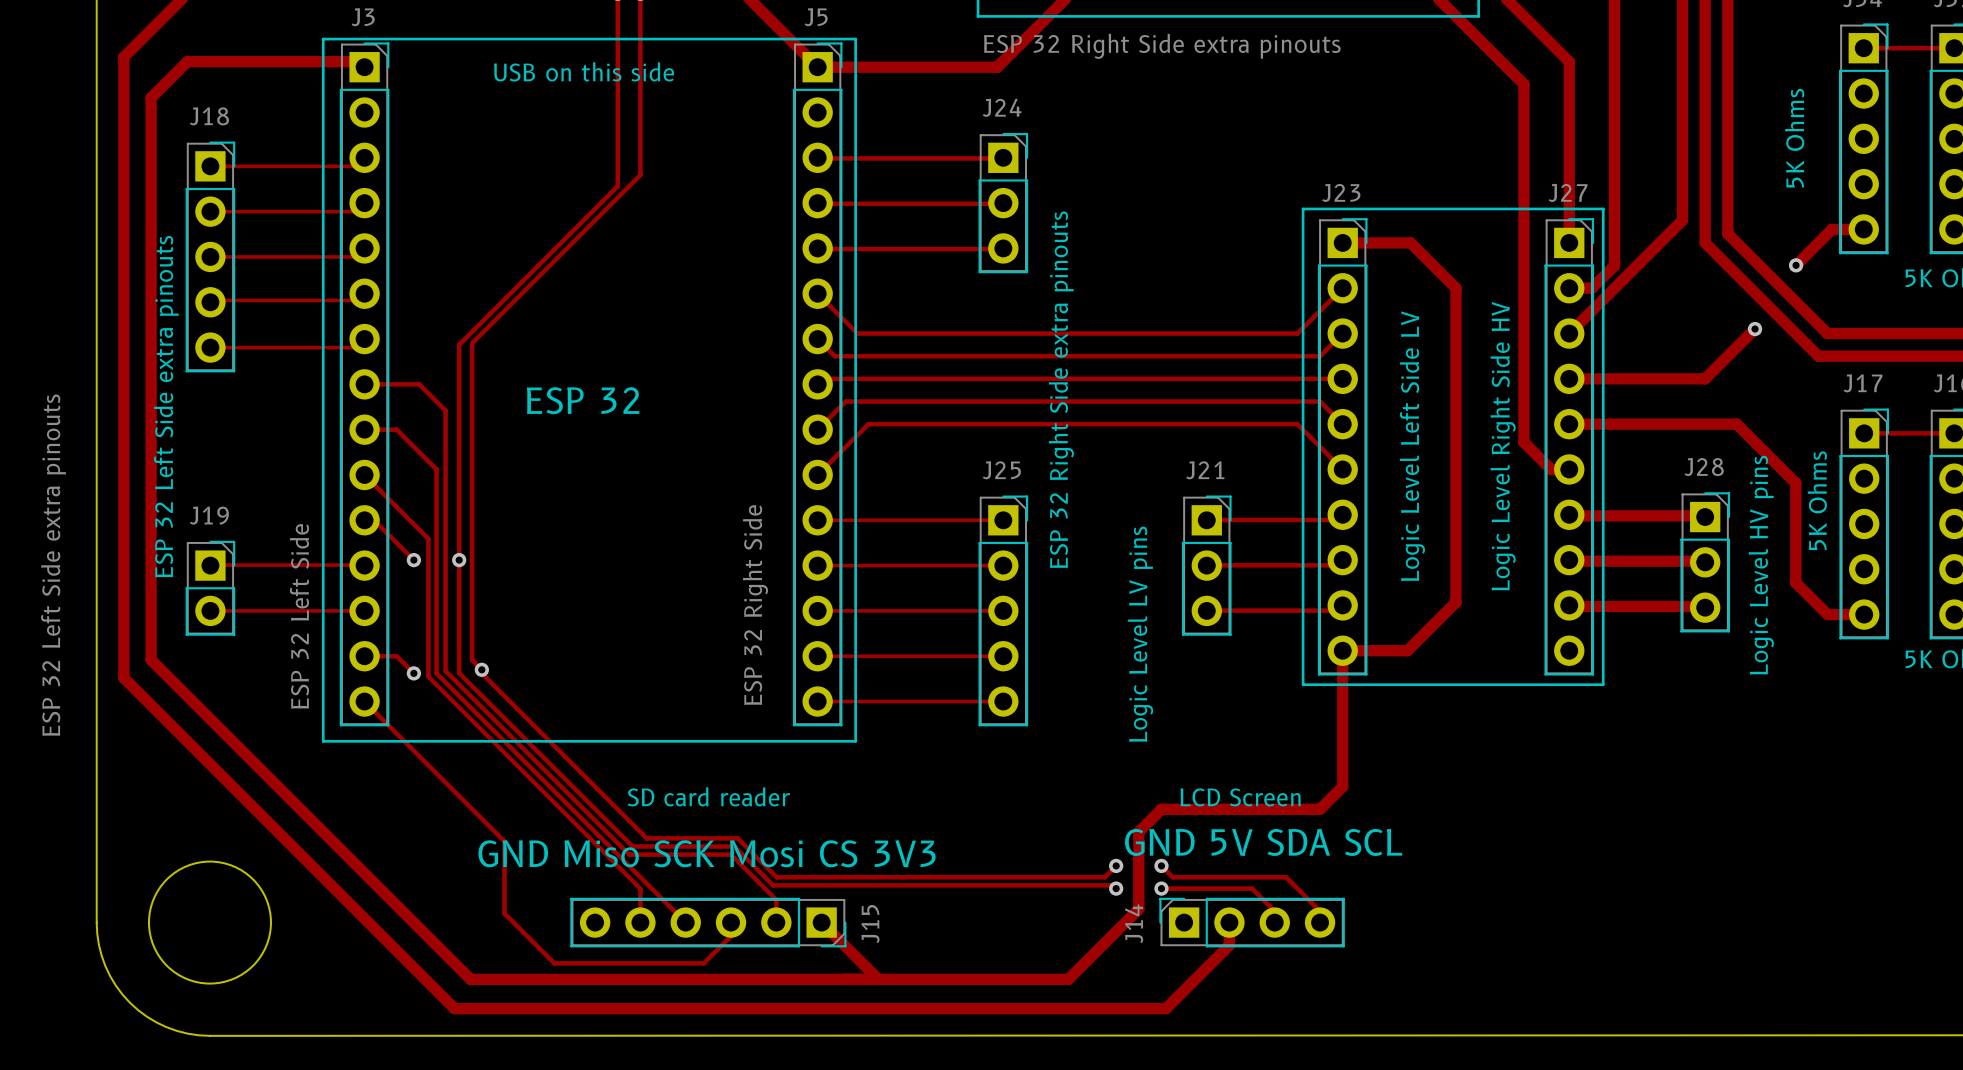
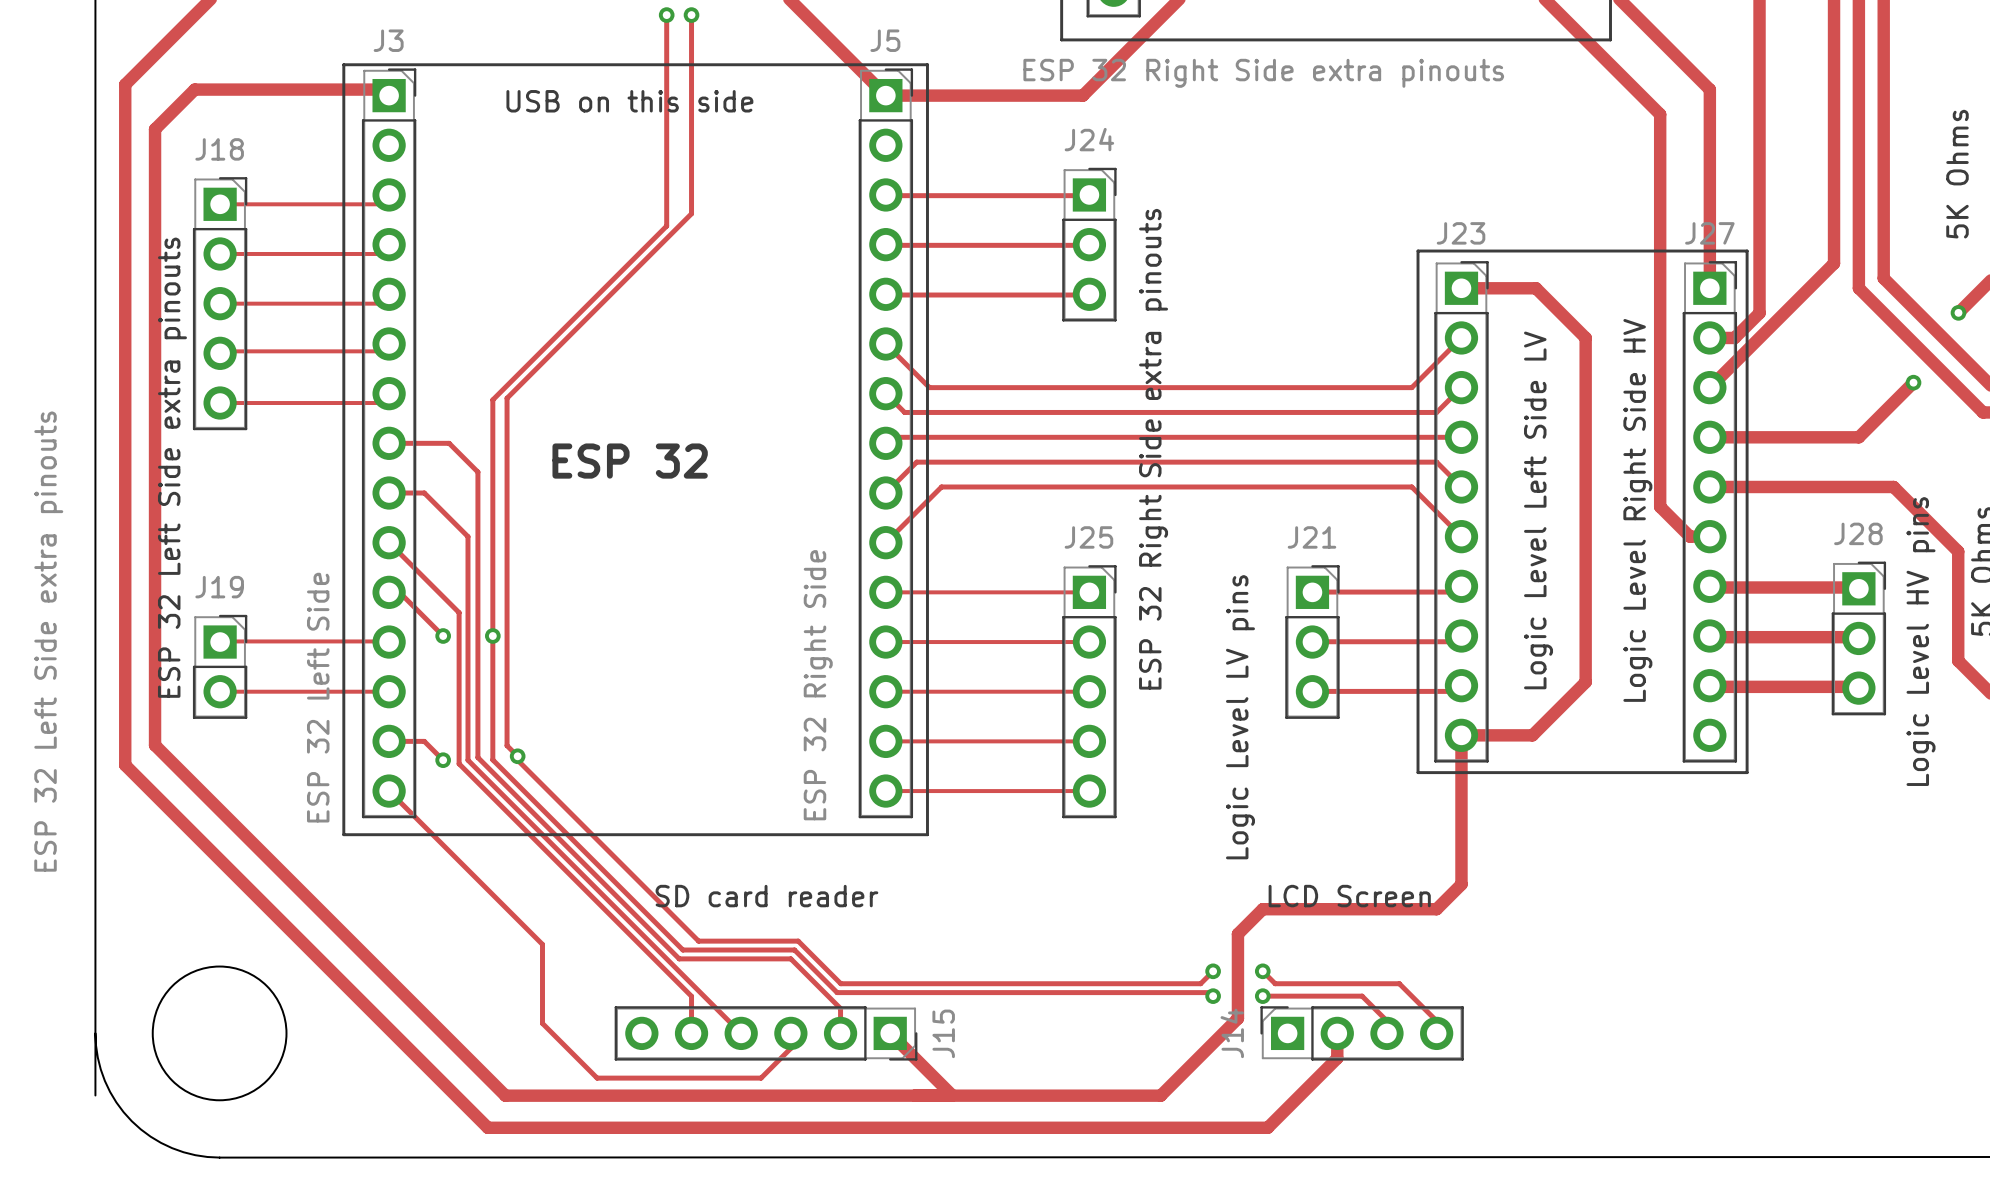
text: GND 5V SDA SCL (1263, 842) -> none
text: GND Miso SCK Mosi CS 3V3 (707, 853) -> none
board edge: none -> (95, 1033) (95, 1095)

